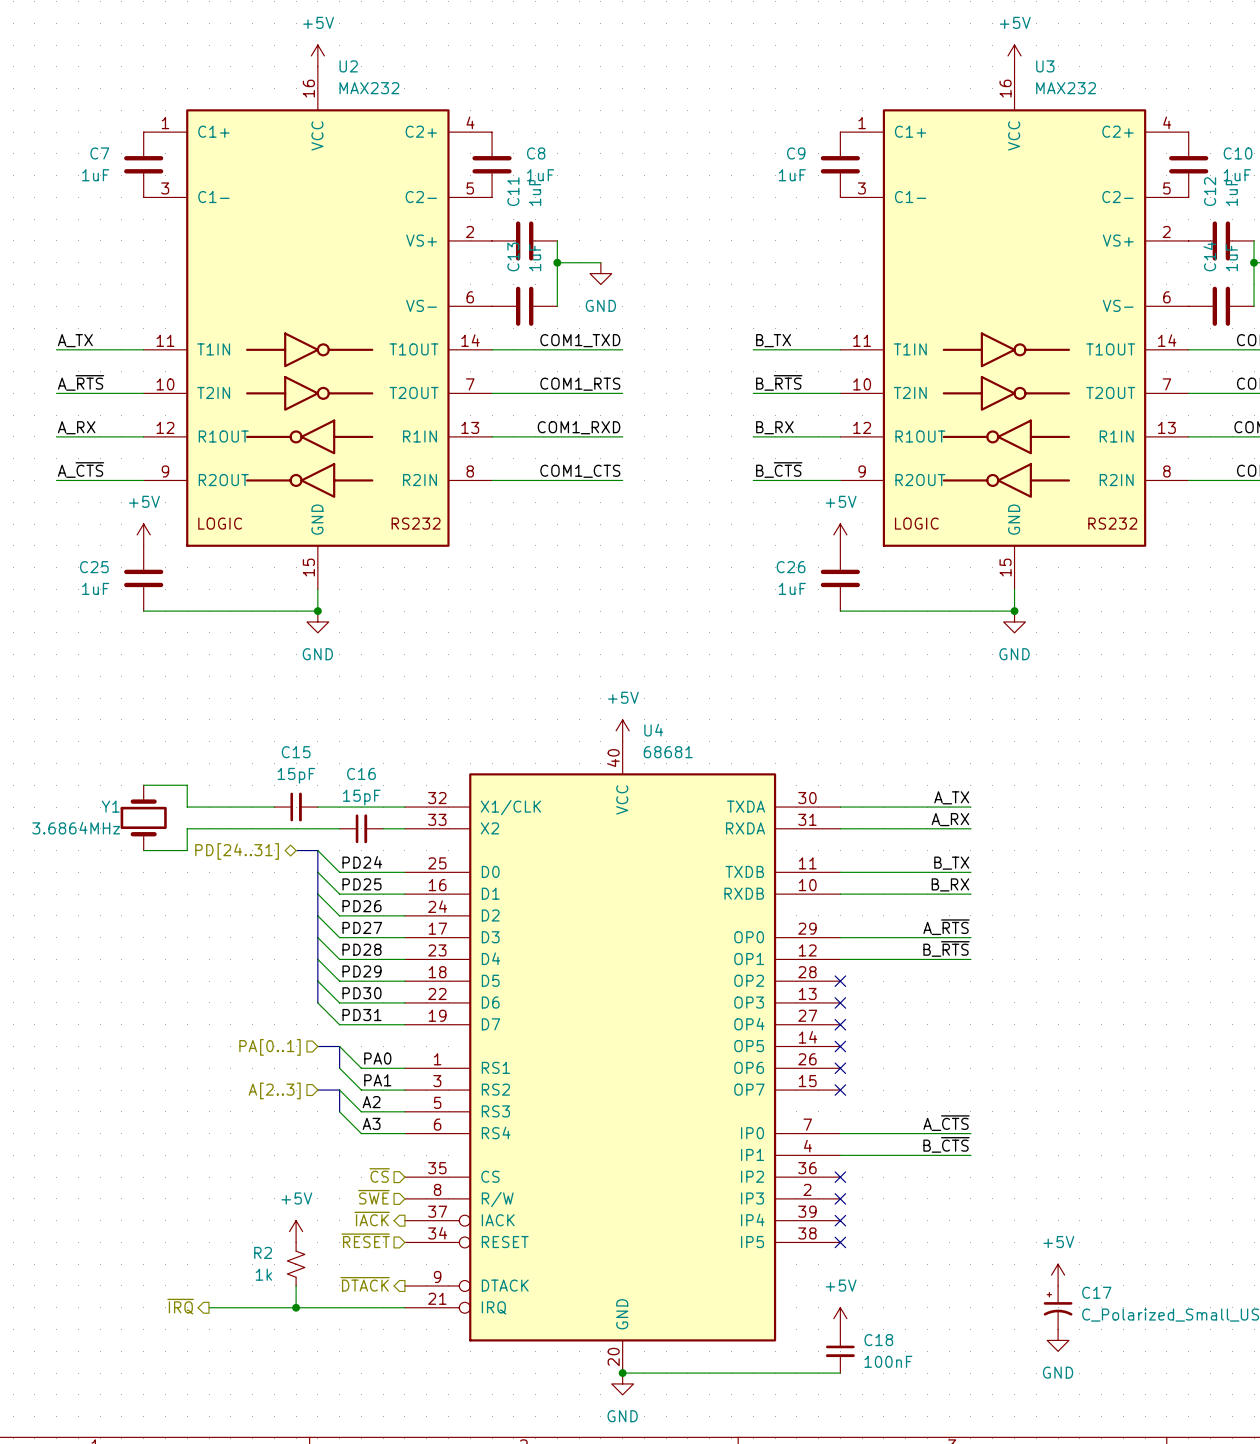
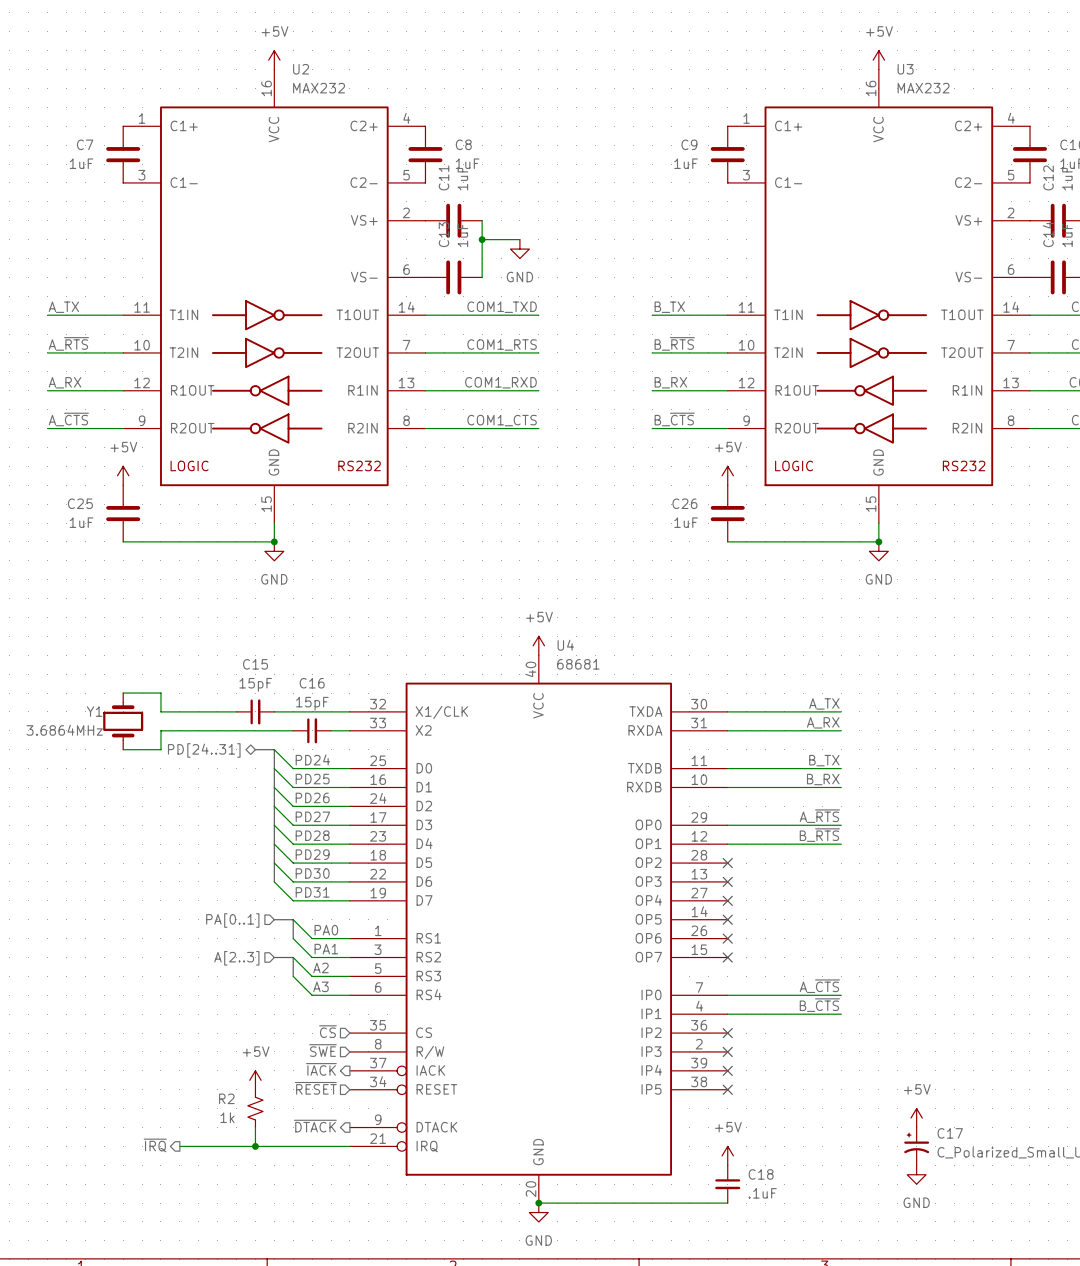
C18 value: 100nF (888, 1361) -> .1uF (762, 1193)

